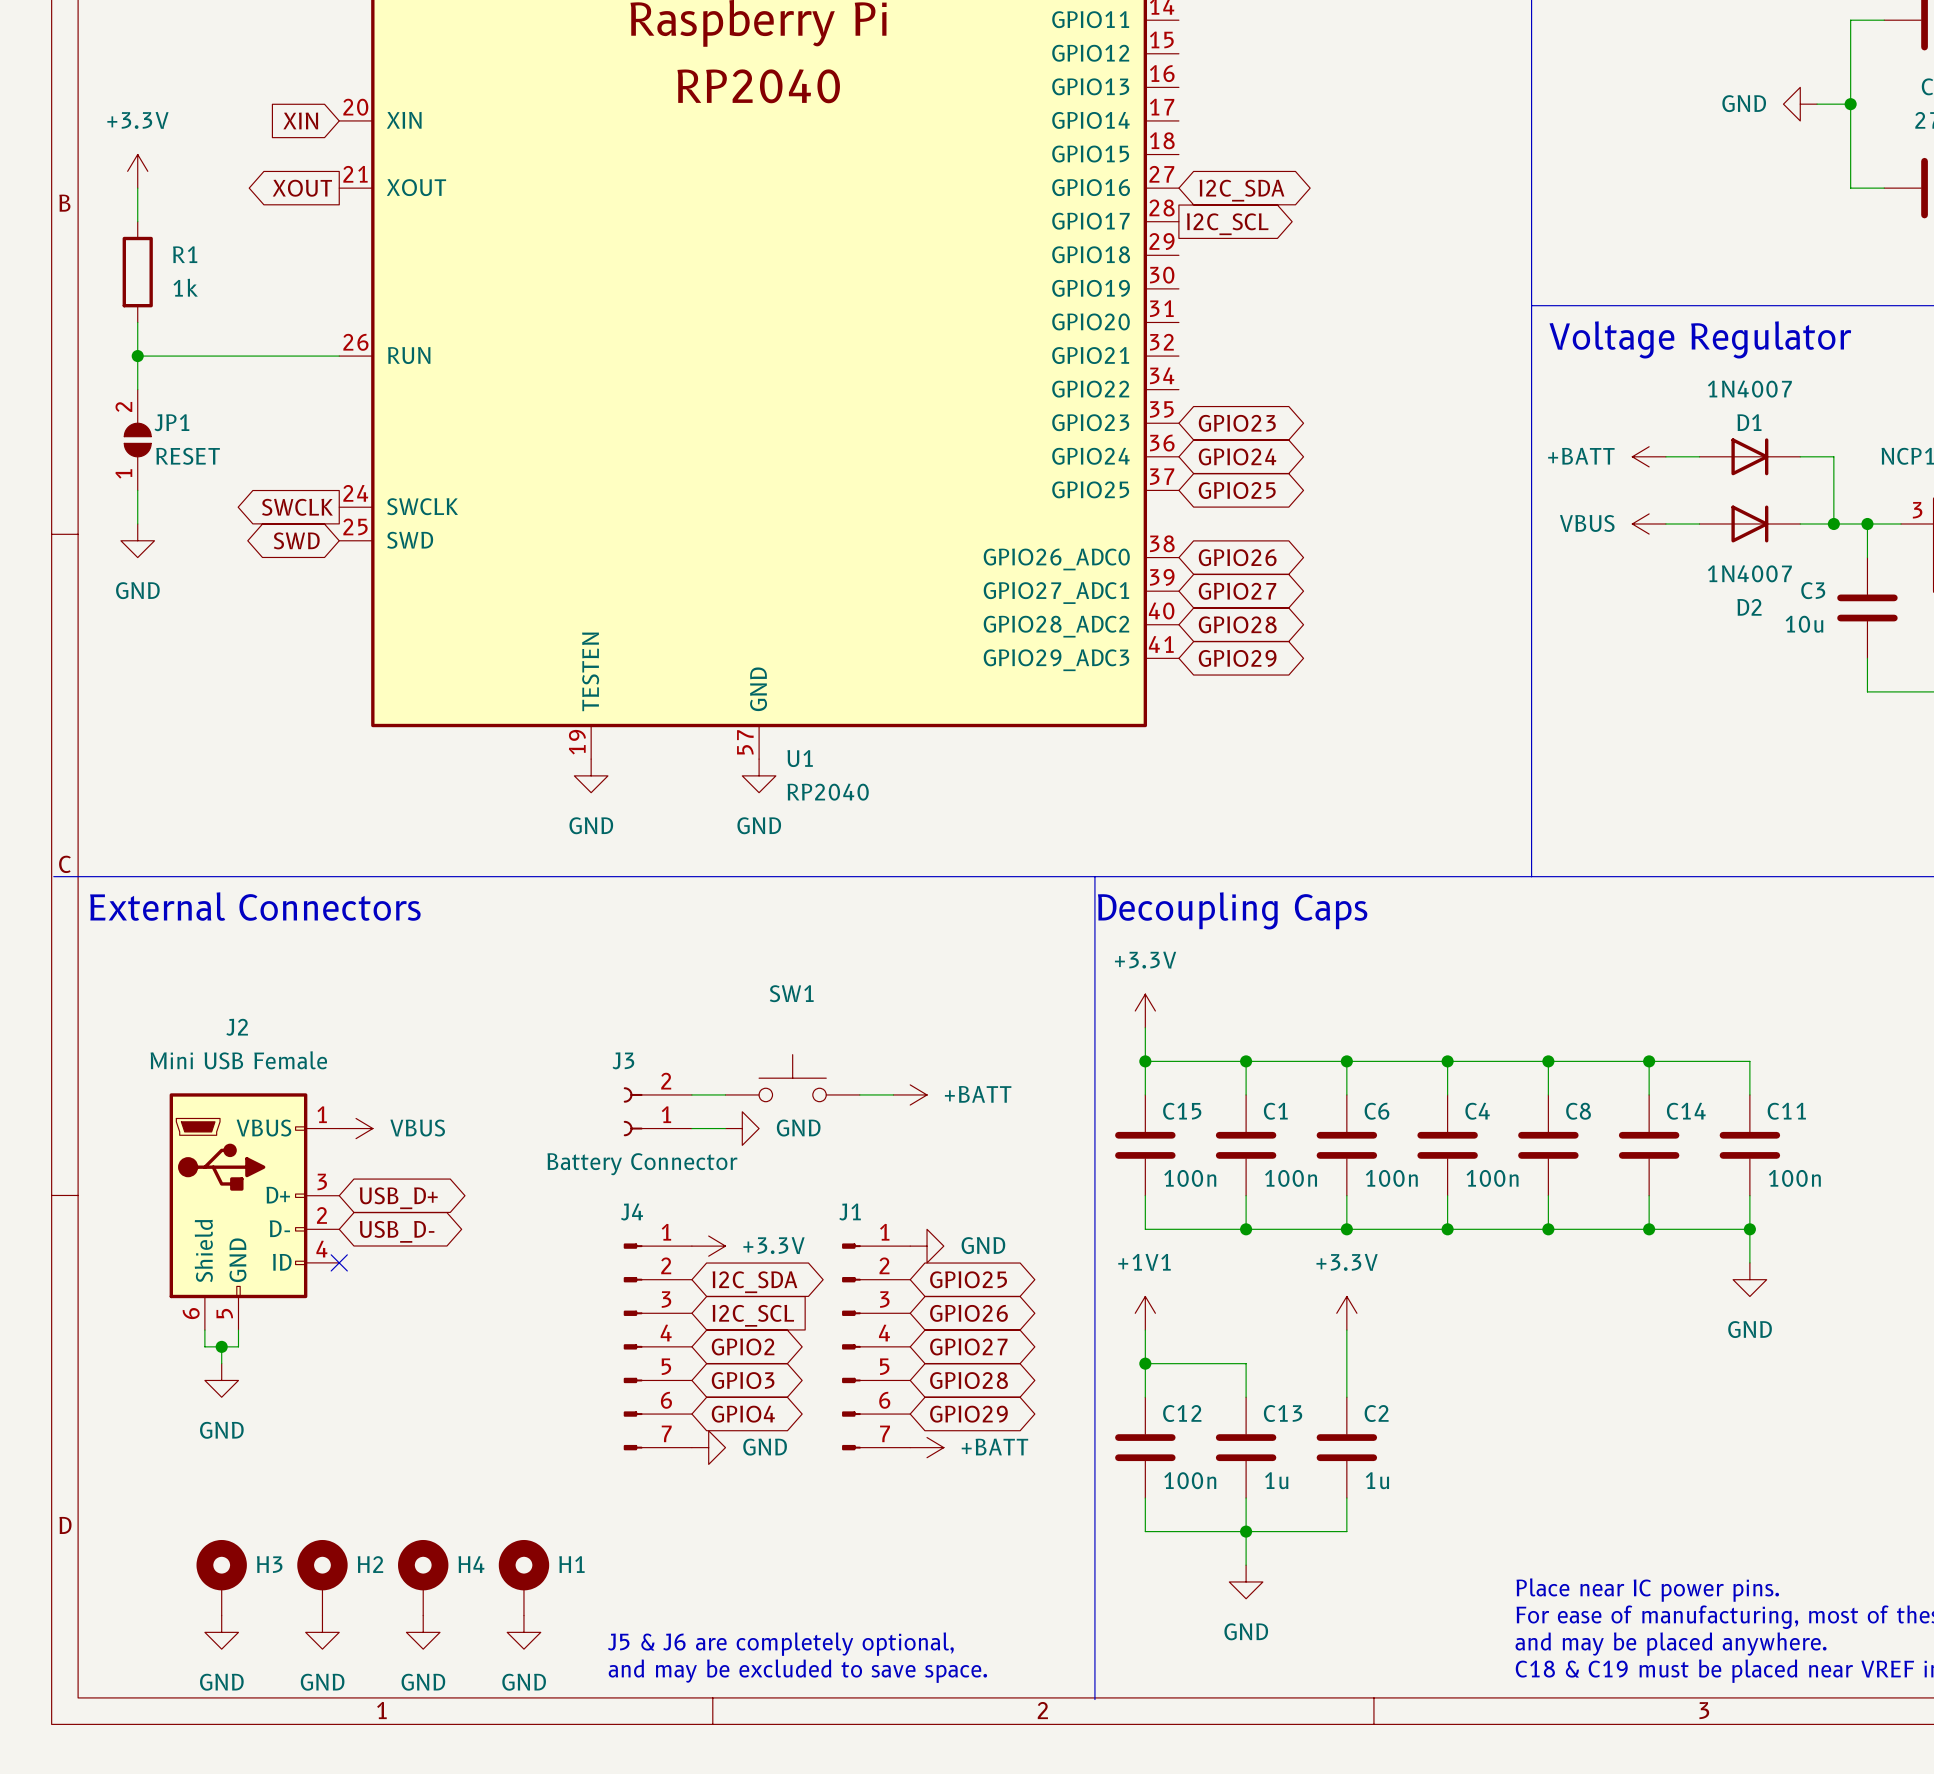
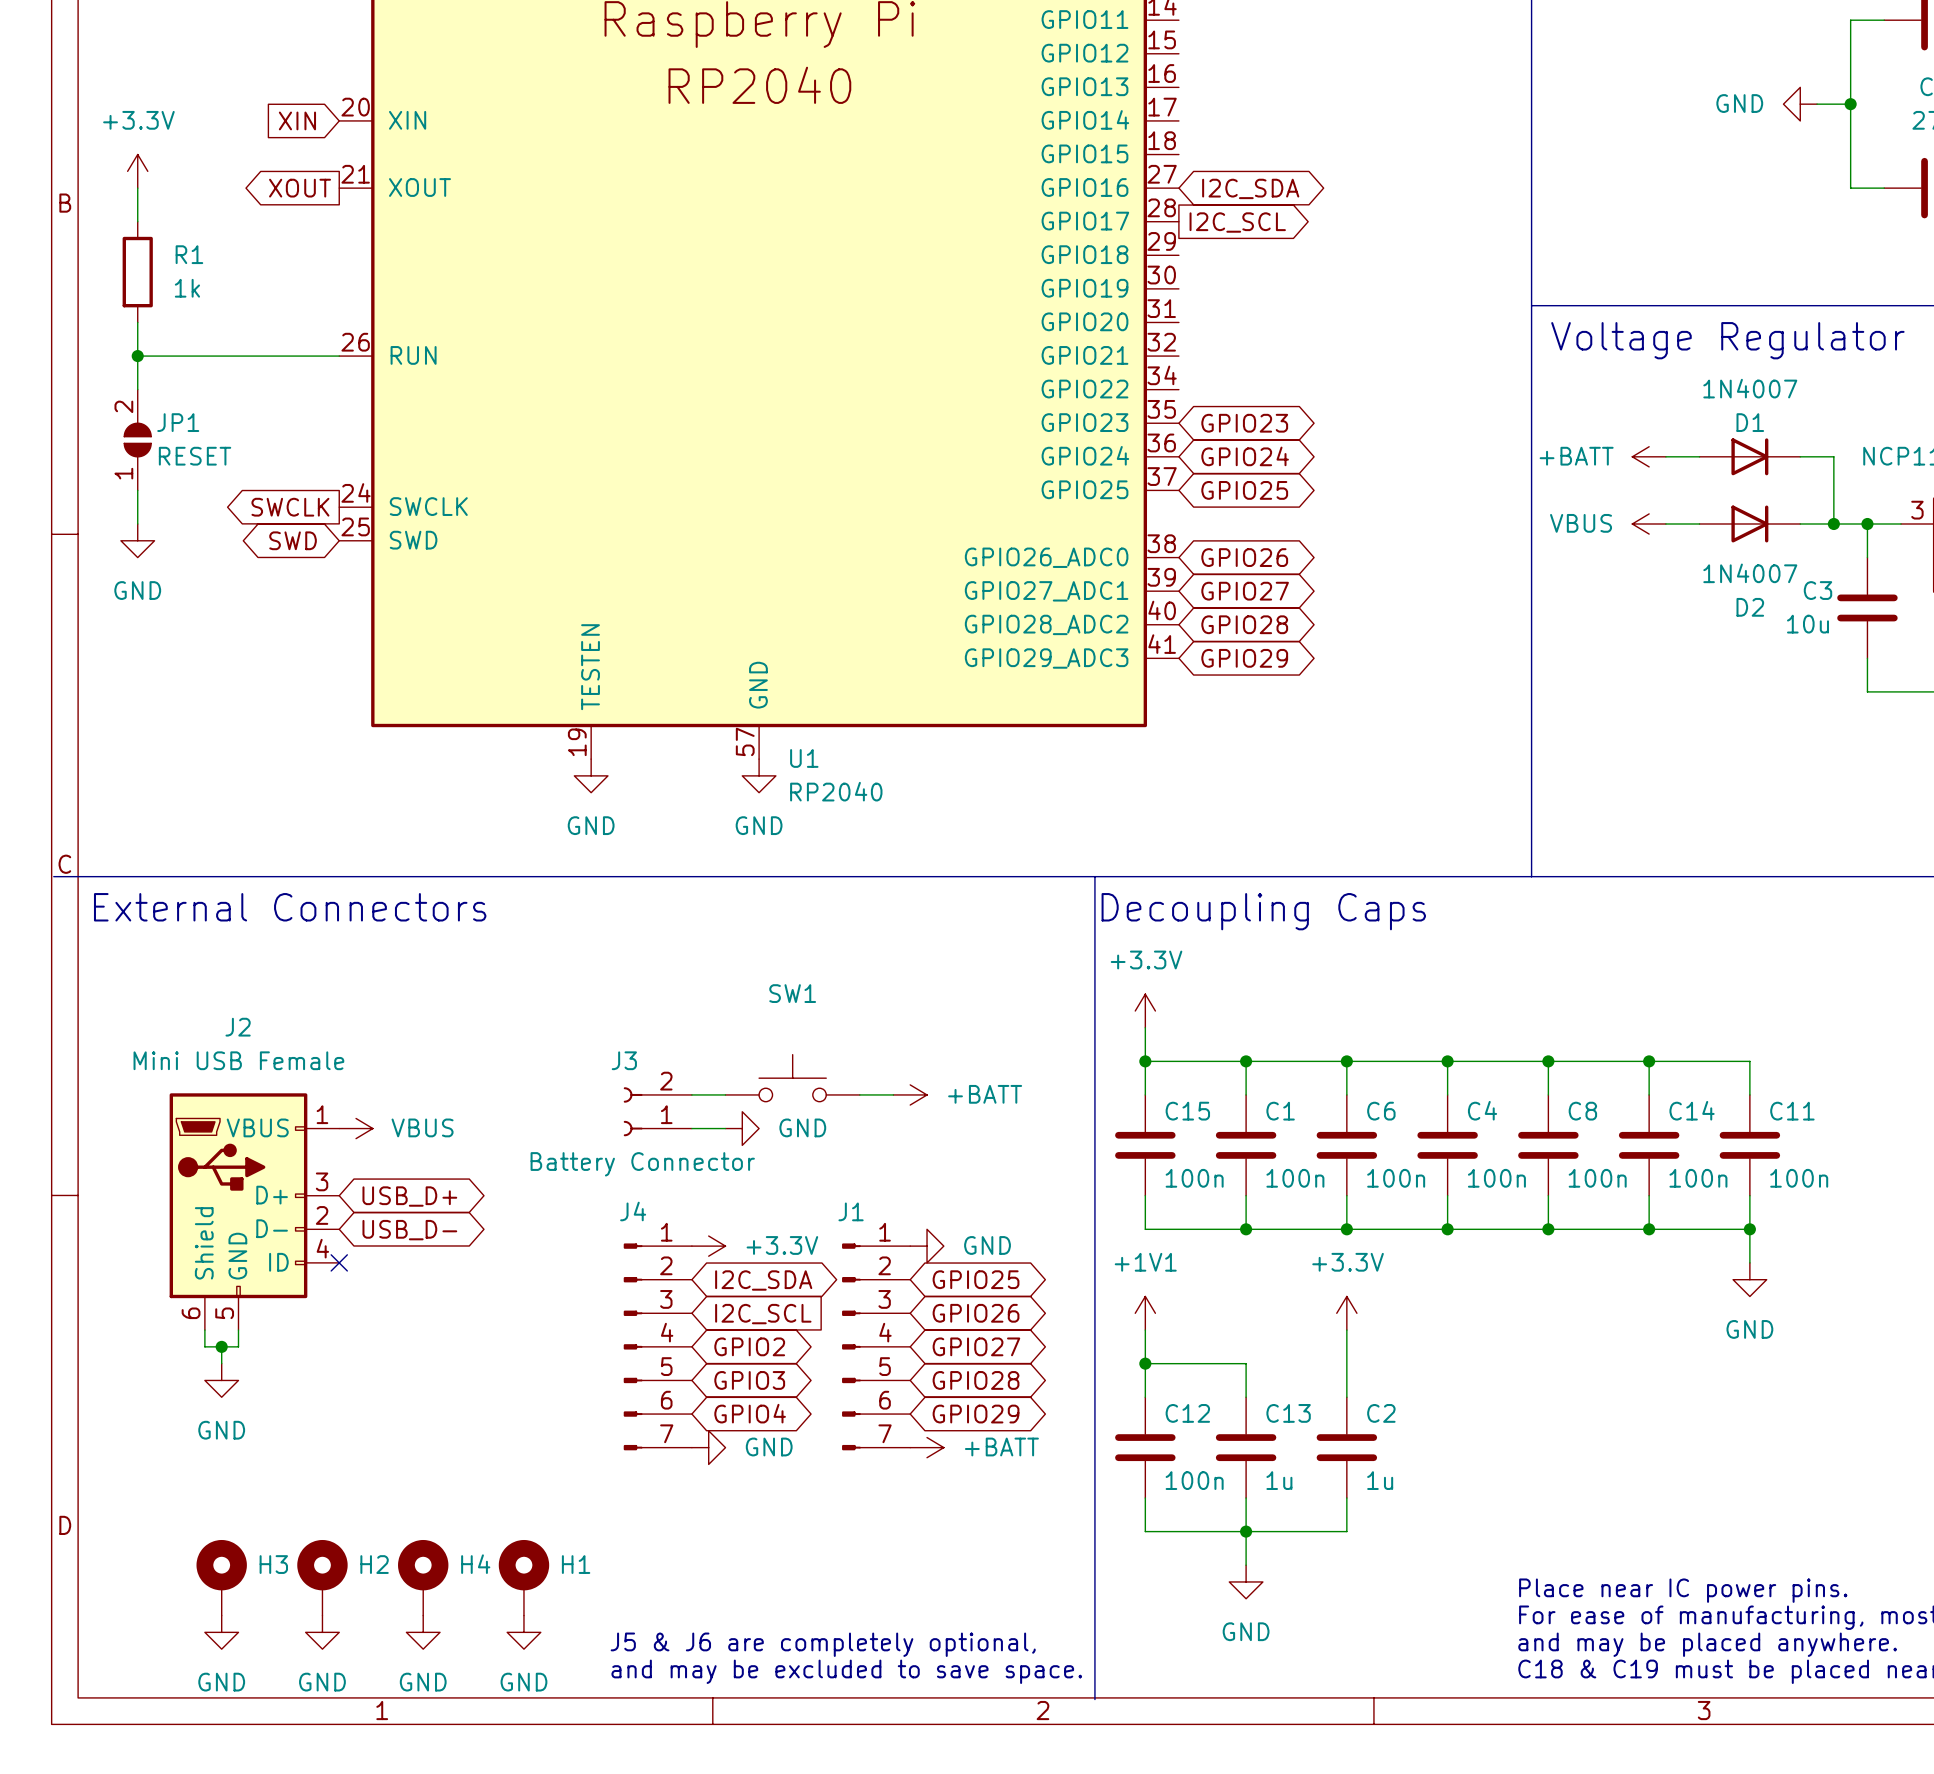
C8 value: none -> 100n (1597, 1178)
C14 value: none -> 100n (1698, 1178)

